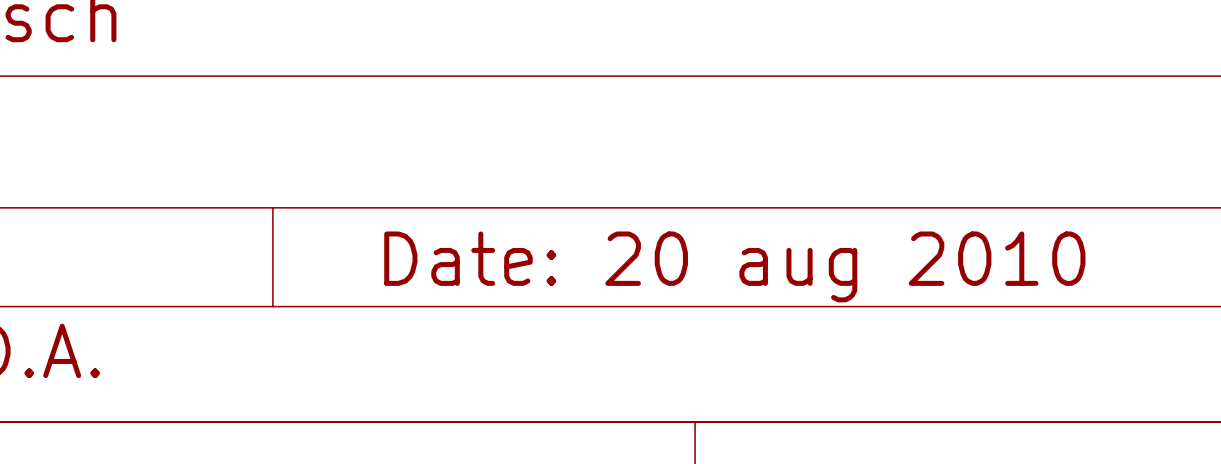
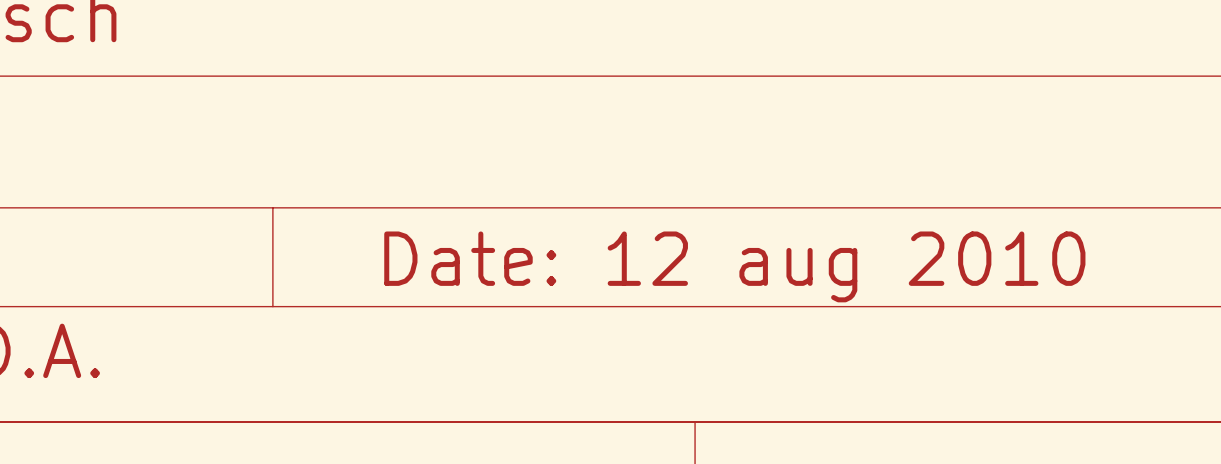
title block: Date: 20 aug 2010 (734, 266) -> Date: 12 aug 2010 (734, 266)

